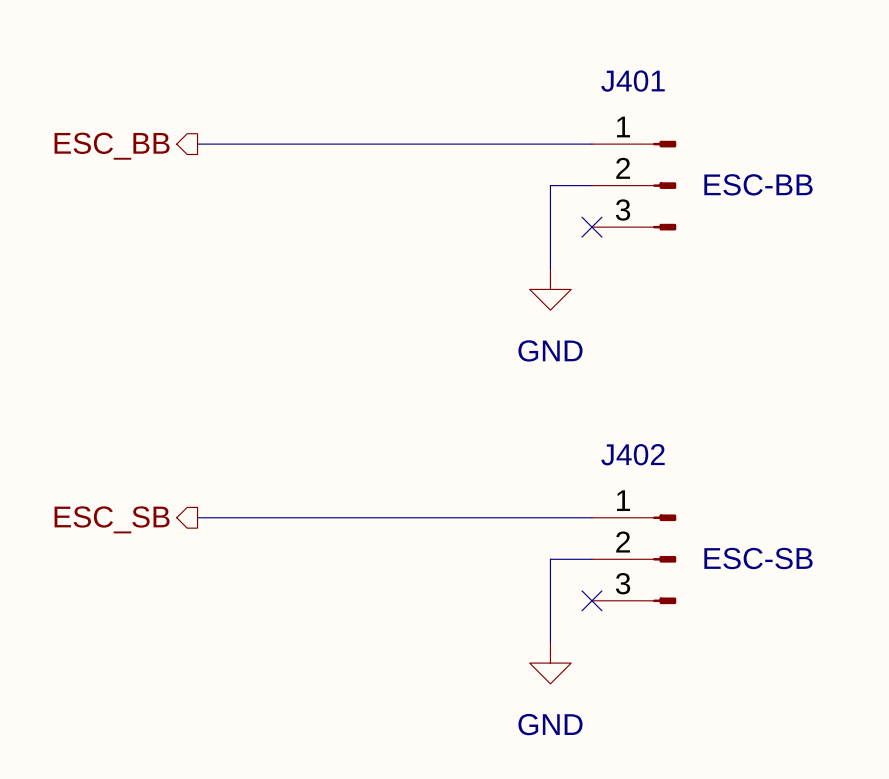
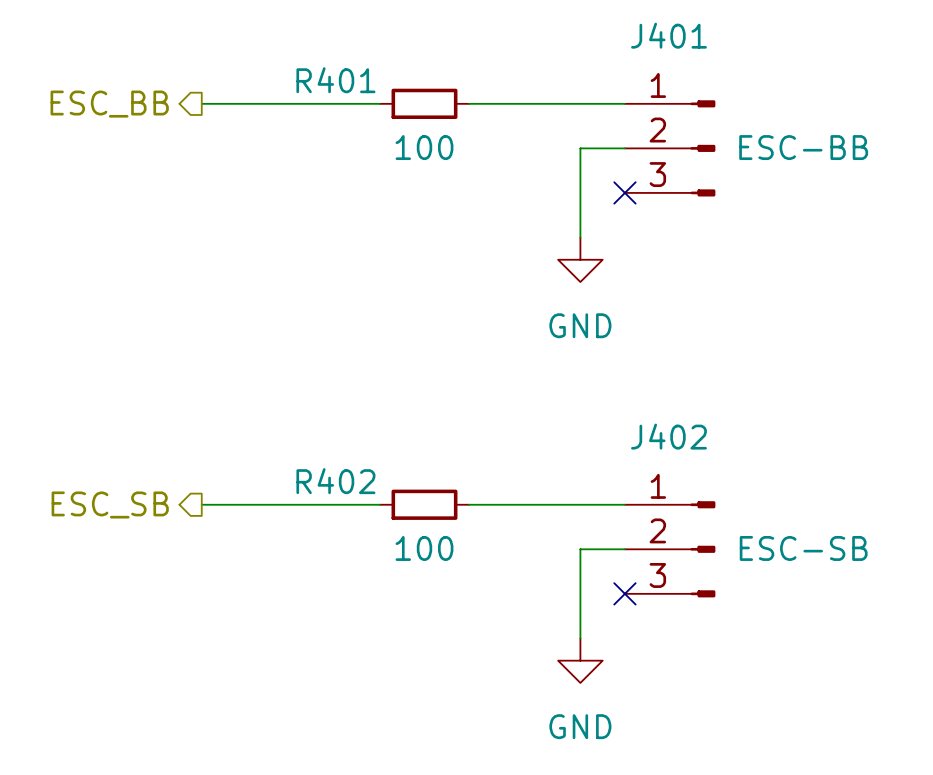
wire: (363, 144) (446, 144) -> none
R401: none -> 100 (424, 103)
wire: (363, 517) (446, 517) -> none
R402: none -> 100 (424, 504)

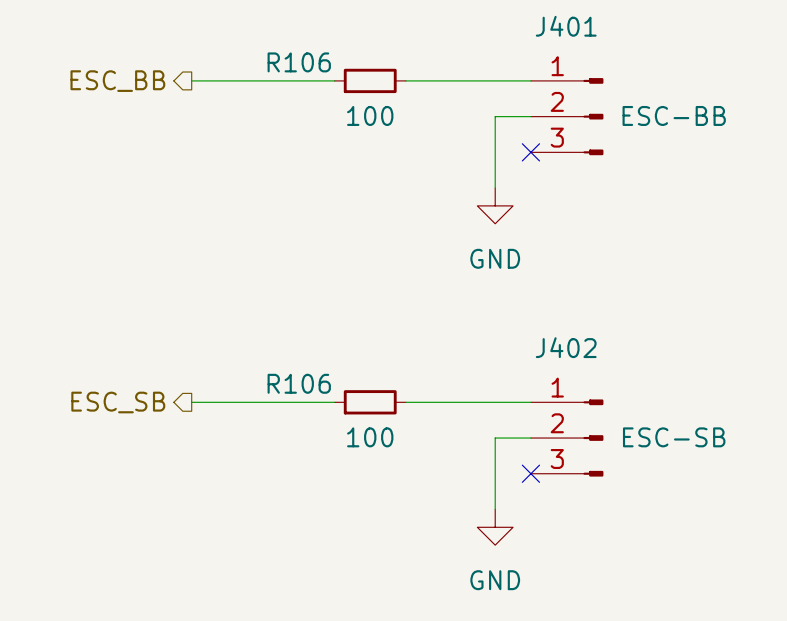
R401 name: R401 (335, 80) -> R106 (299, 62)
R402 name: R402 (335, 481) -> R106 (299, 383)

